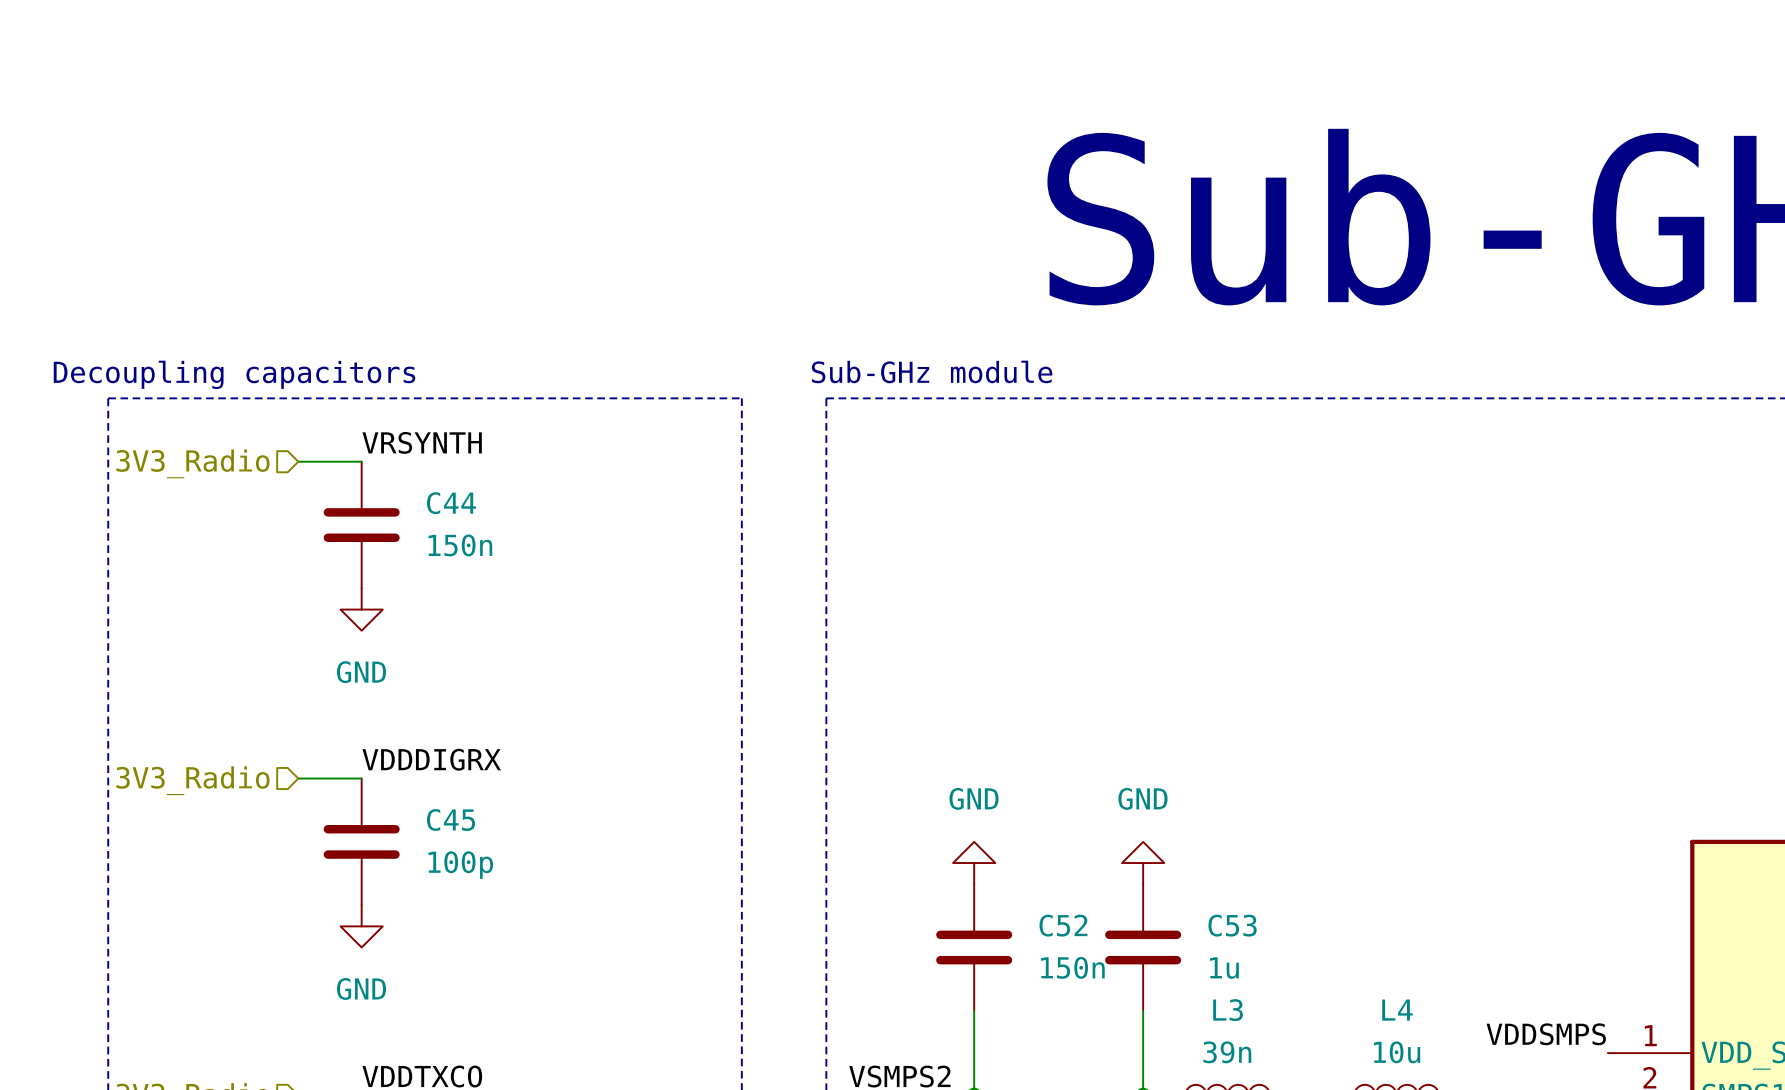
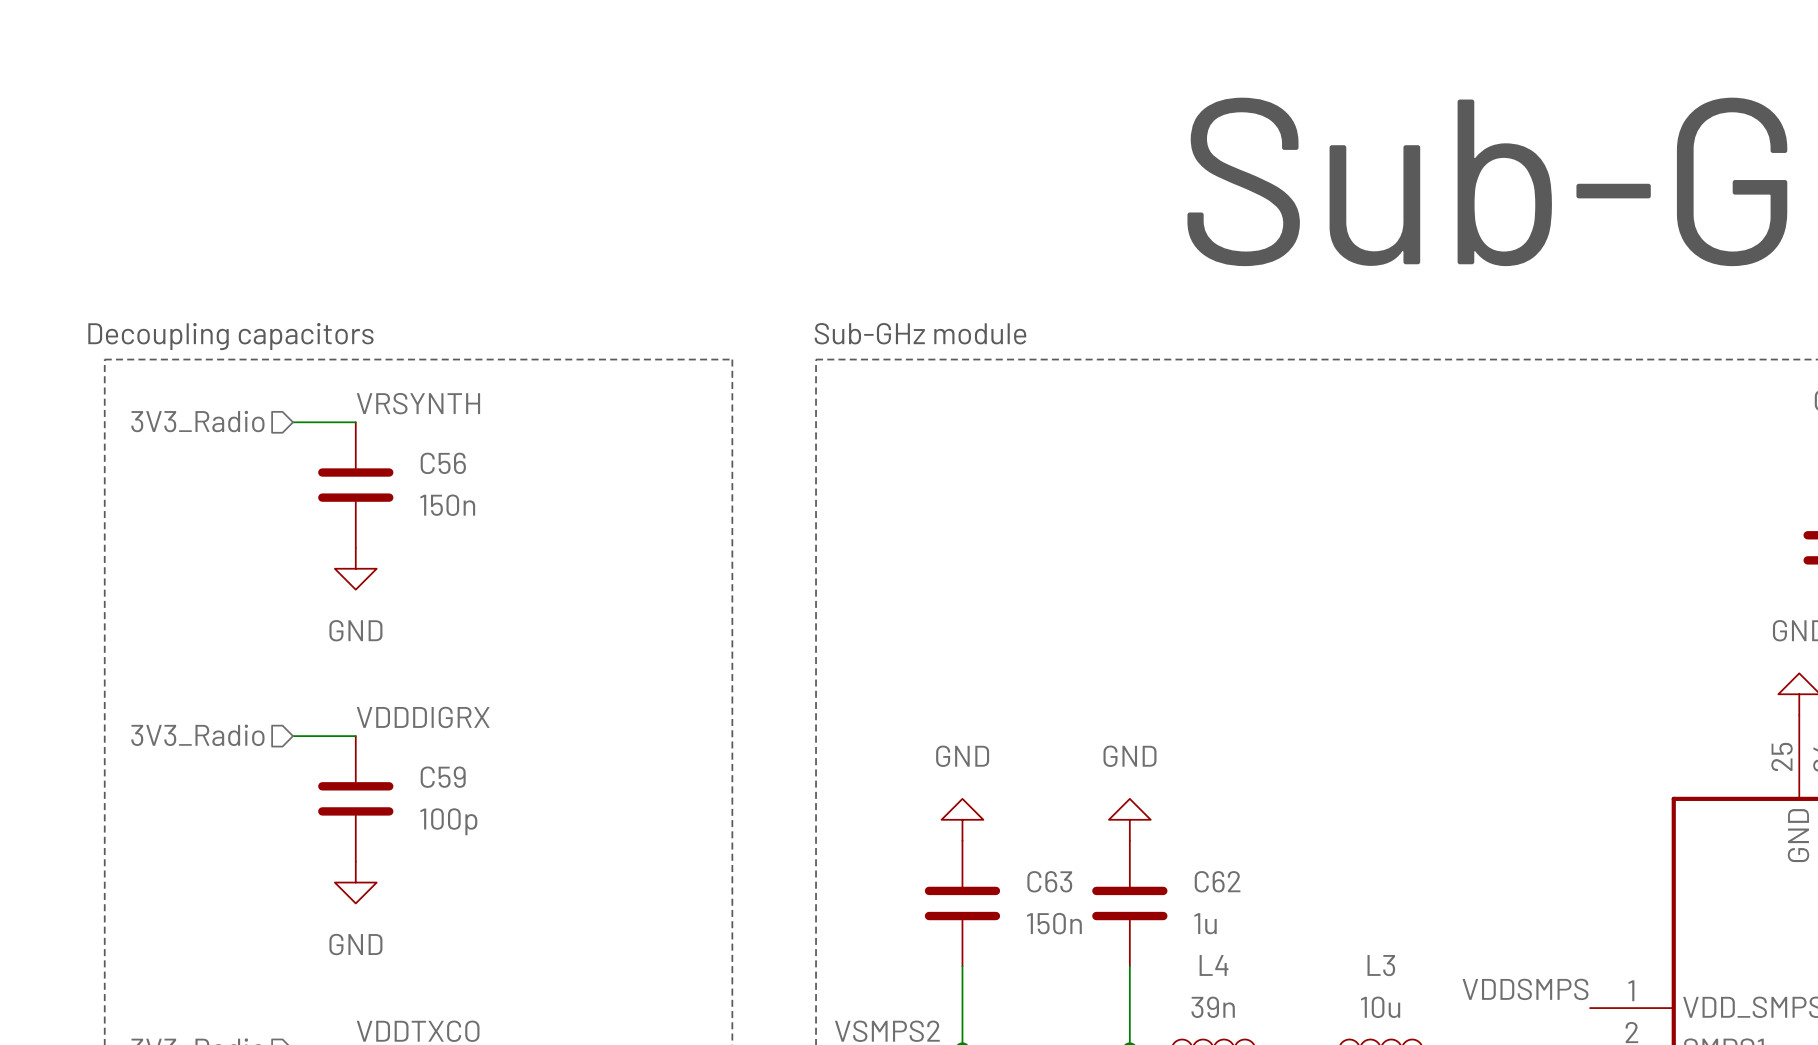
C44 name: C44 (451, 503) -> C56 (443, 463)
C45 name: C45 (451, 820) -> C59 (443, 777)
C52 name: C52 (1063, 925) -> C63 (1049, 881)
C53 name: C53 (1232, 925) -> C62 (1217, 881)
L3 name: L3 (1228, 1010) -> L4 (1214, 965)
L4 name: L4 (1397, 1010) -> L3 (1381, 965)

